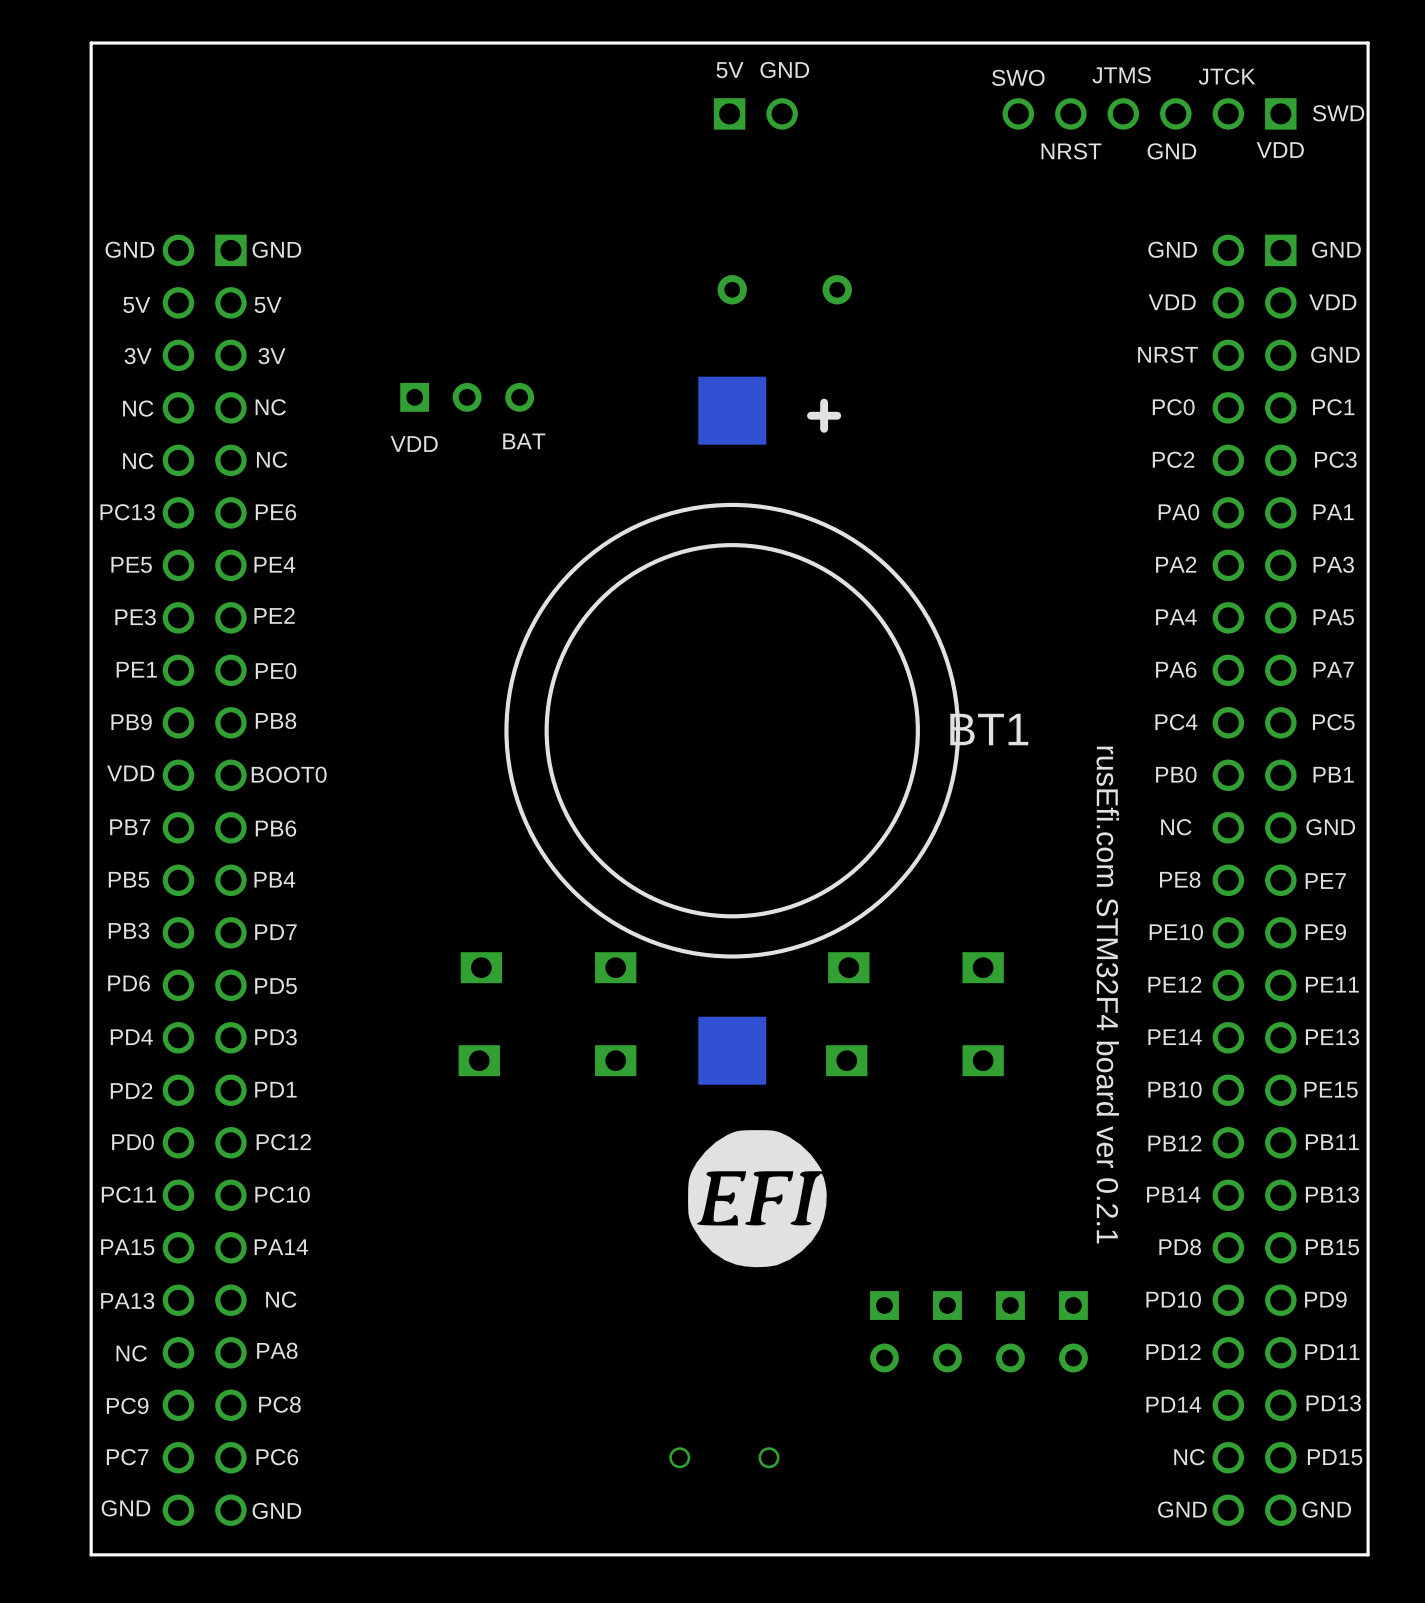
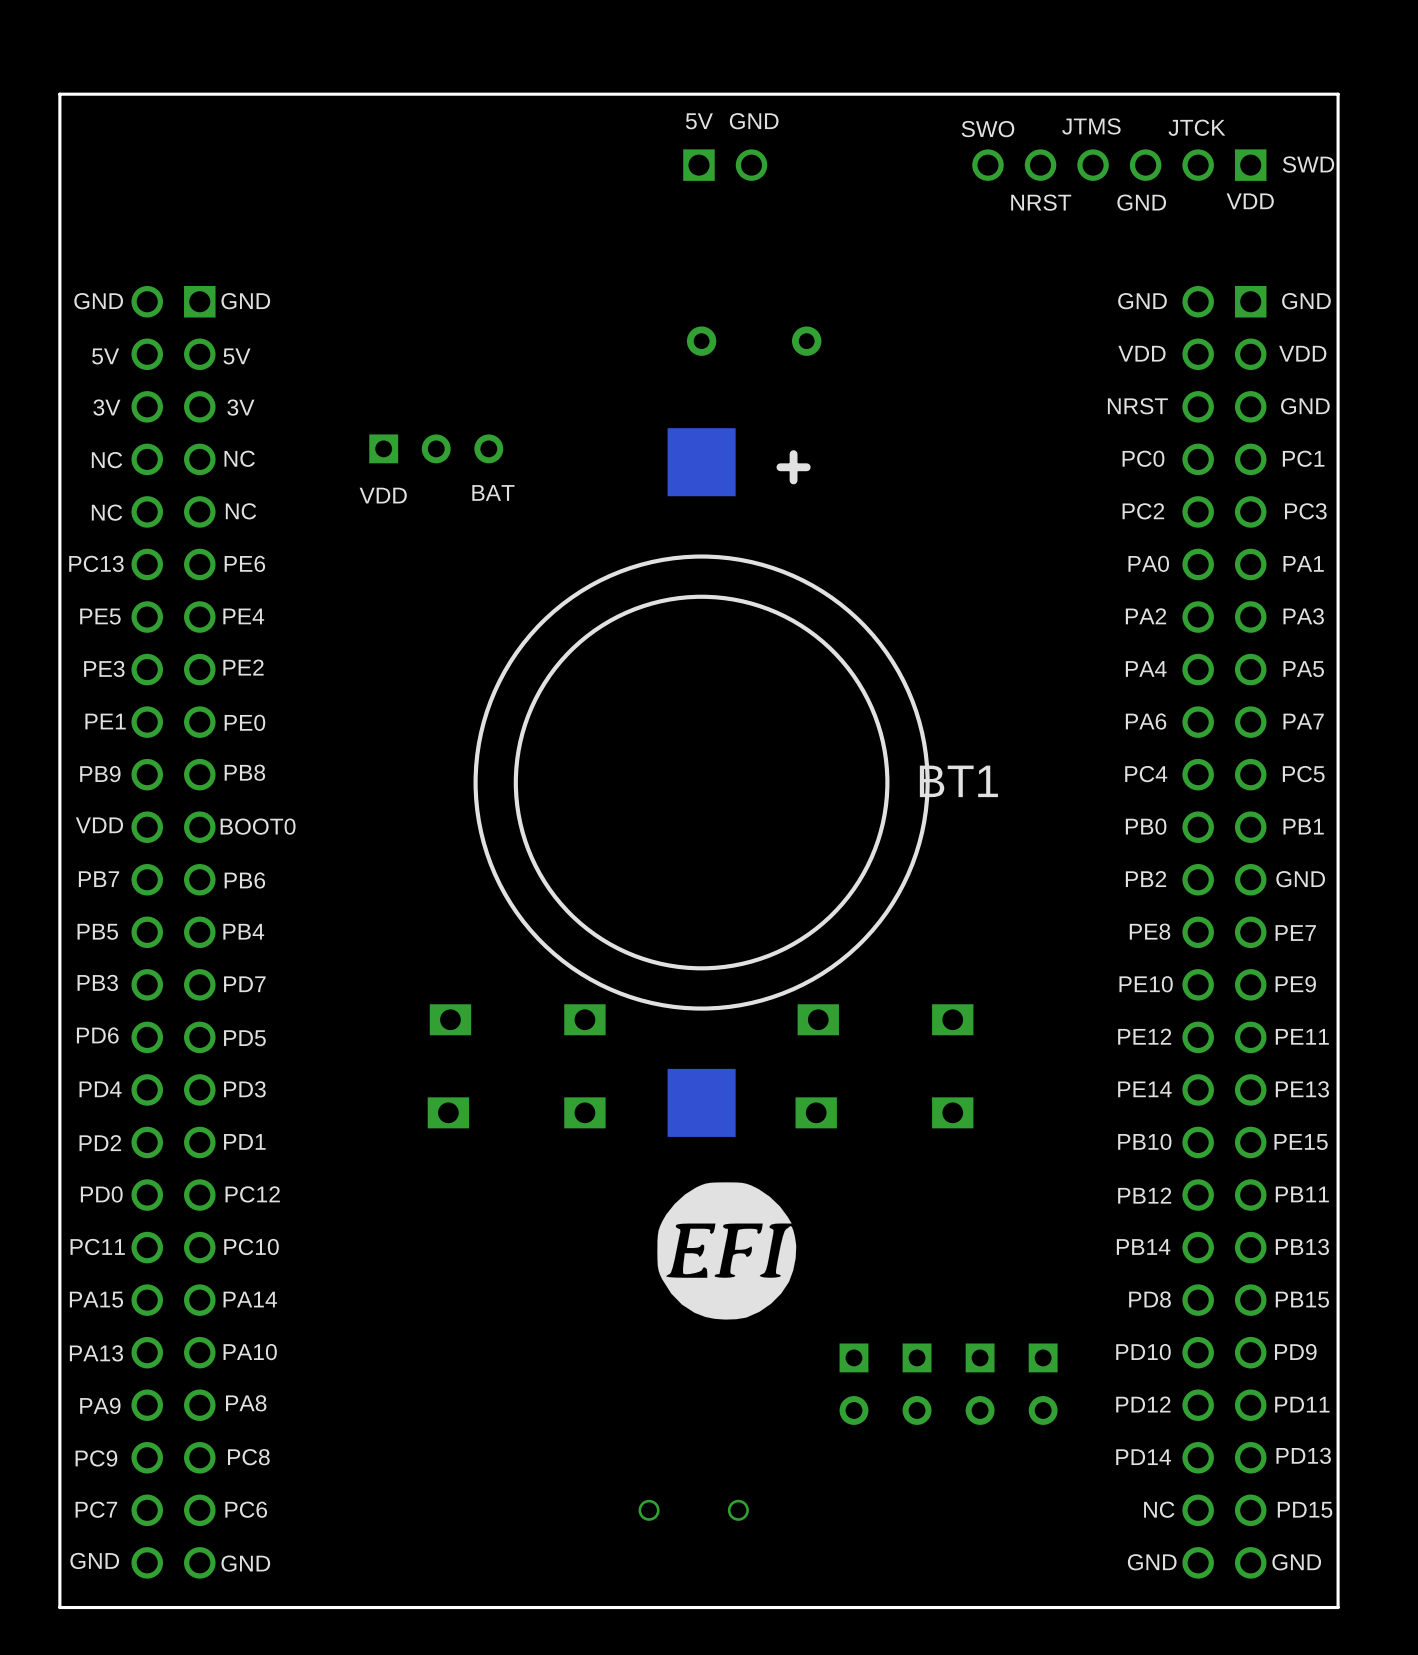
text: NC (1176, 827) -> PB2 (1145, 879)
text: rusEfi.com STM32F4 board ver 0.2.1 (1107, 995) -> none
text: NC (281, 1299) -> PA10 (250, 1352)
text: NC (131, 1353) -> PA9 (100, 1405)

